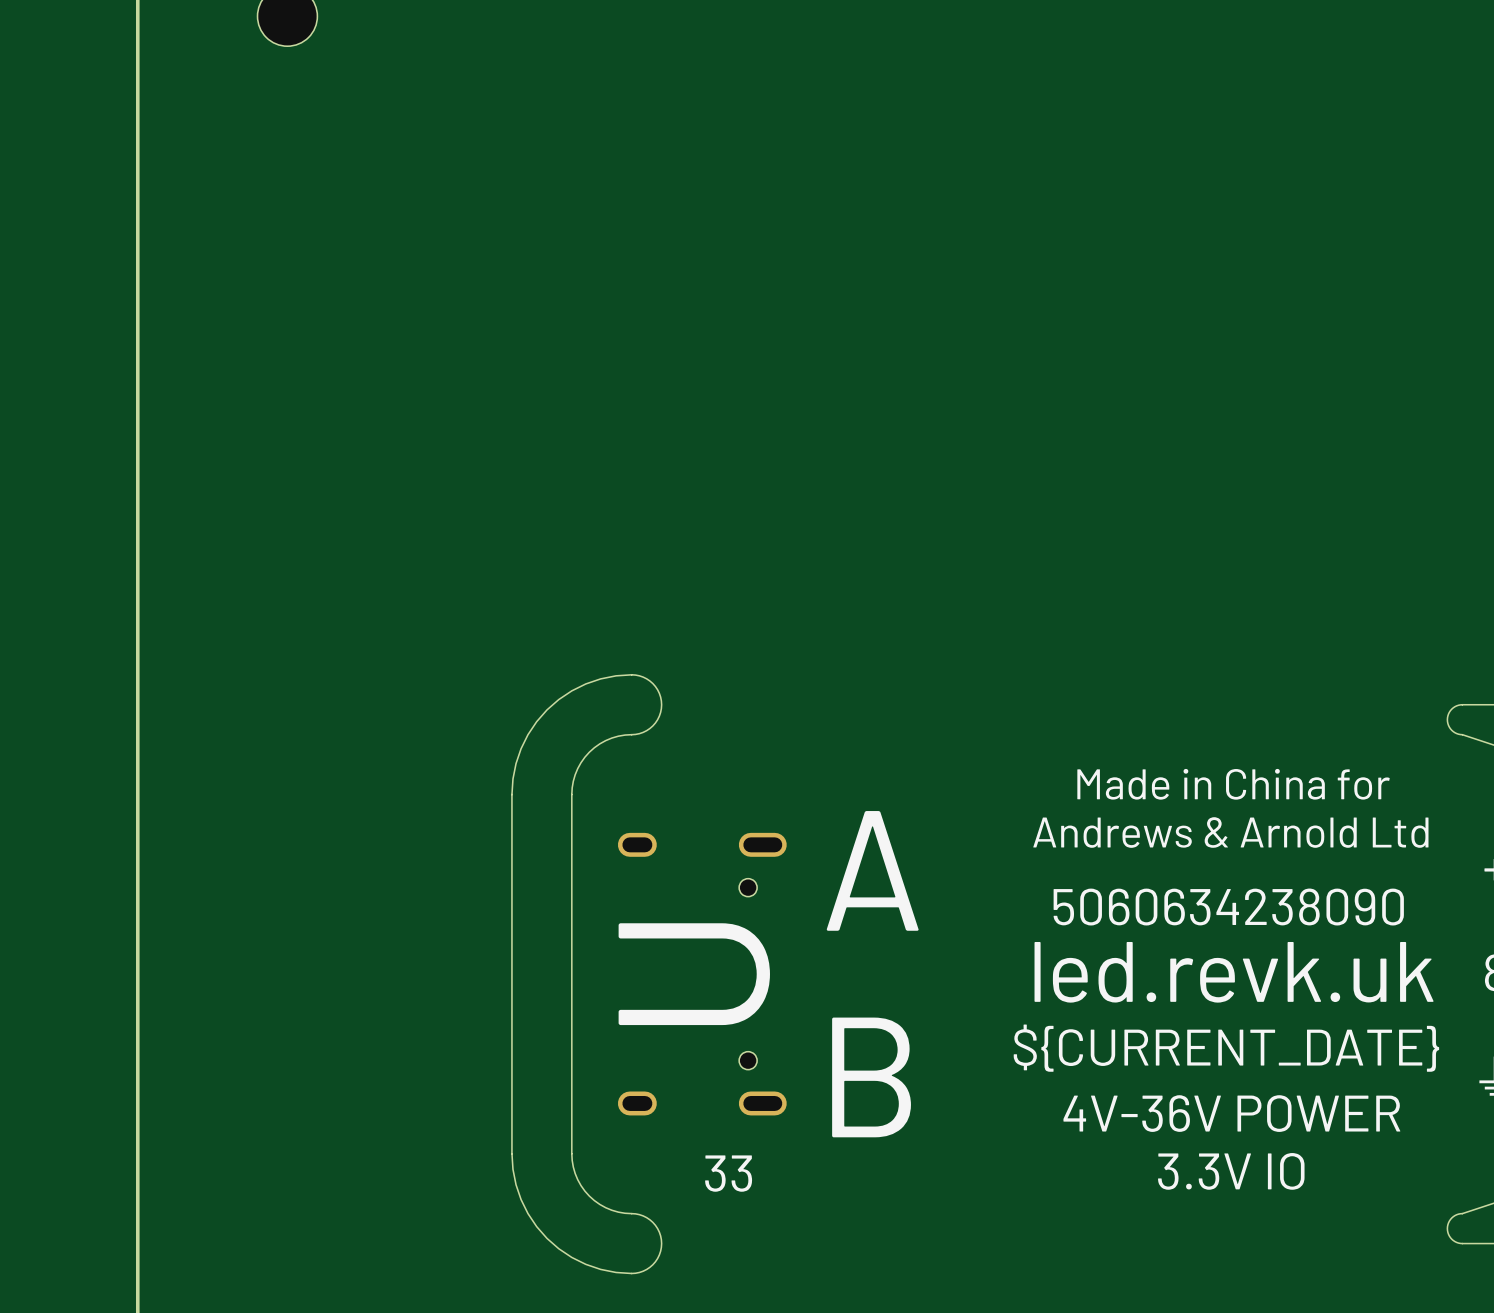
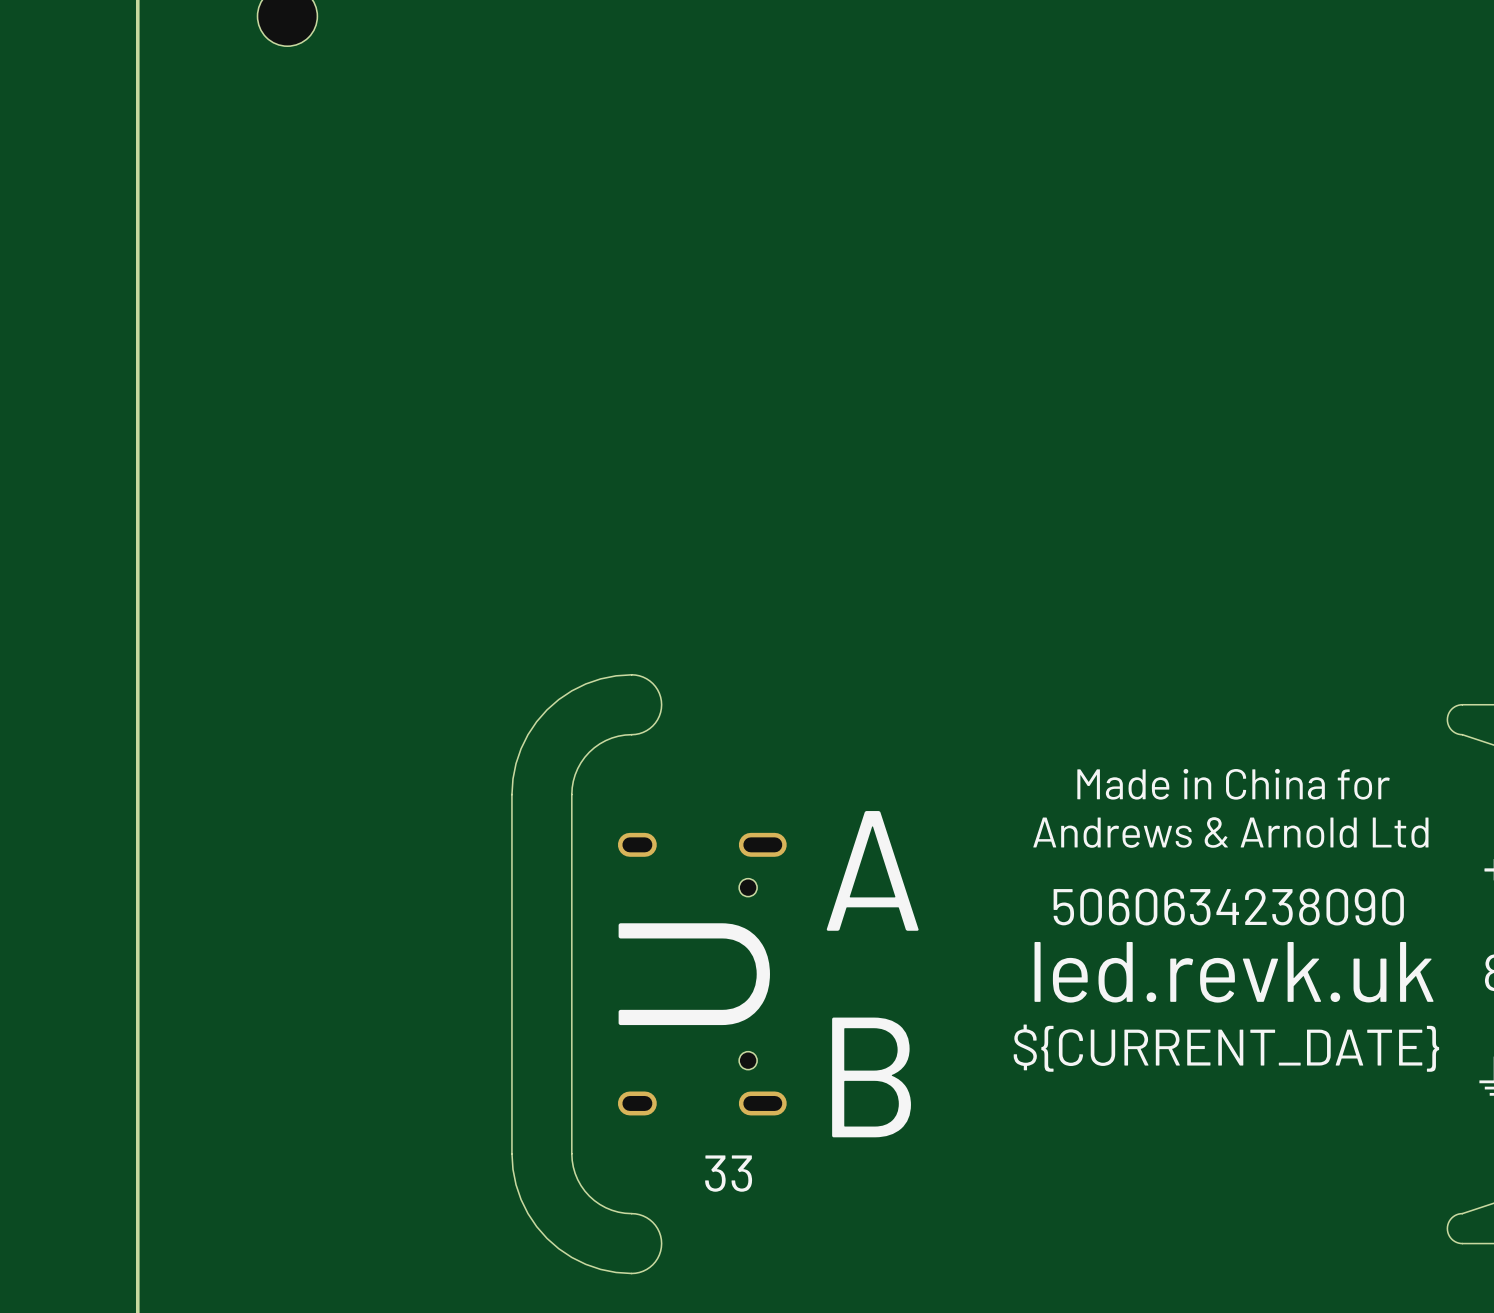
text: 4V-36V POWER (1231, 1113) -> none
text: 3.3V IO (1231, 1171) -> none

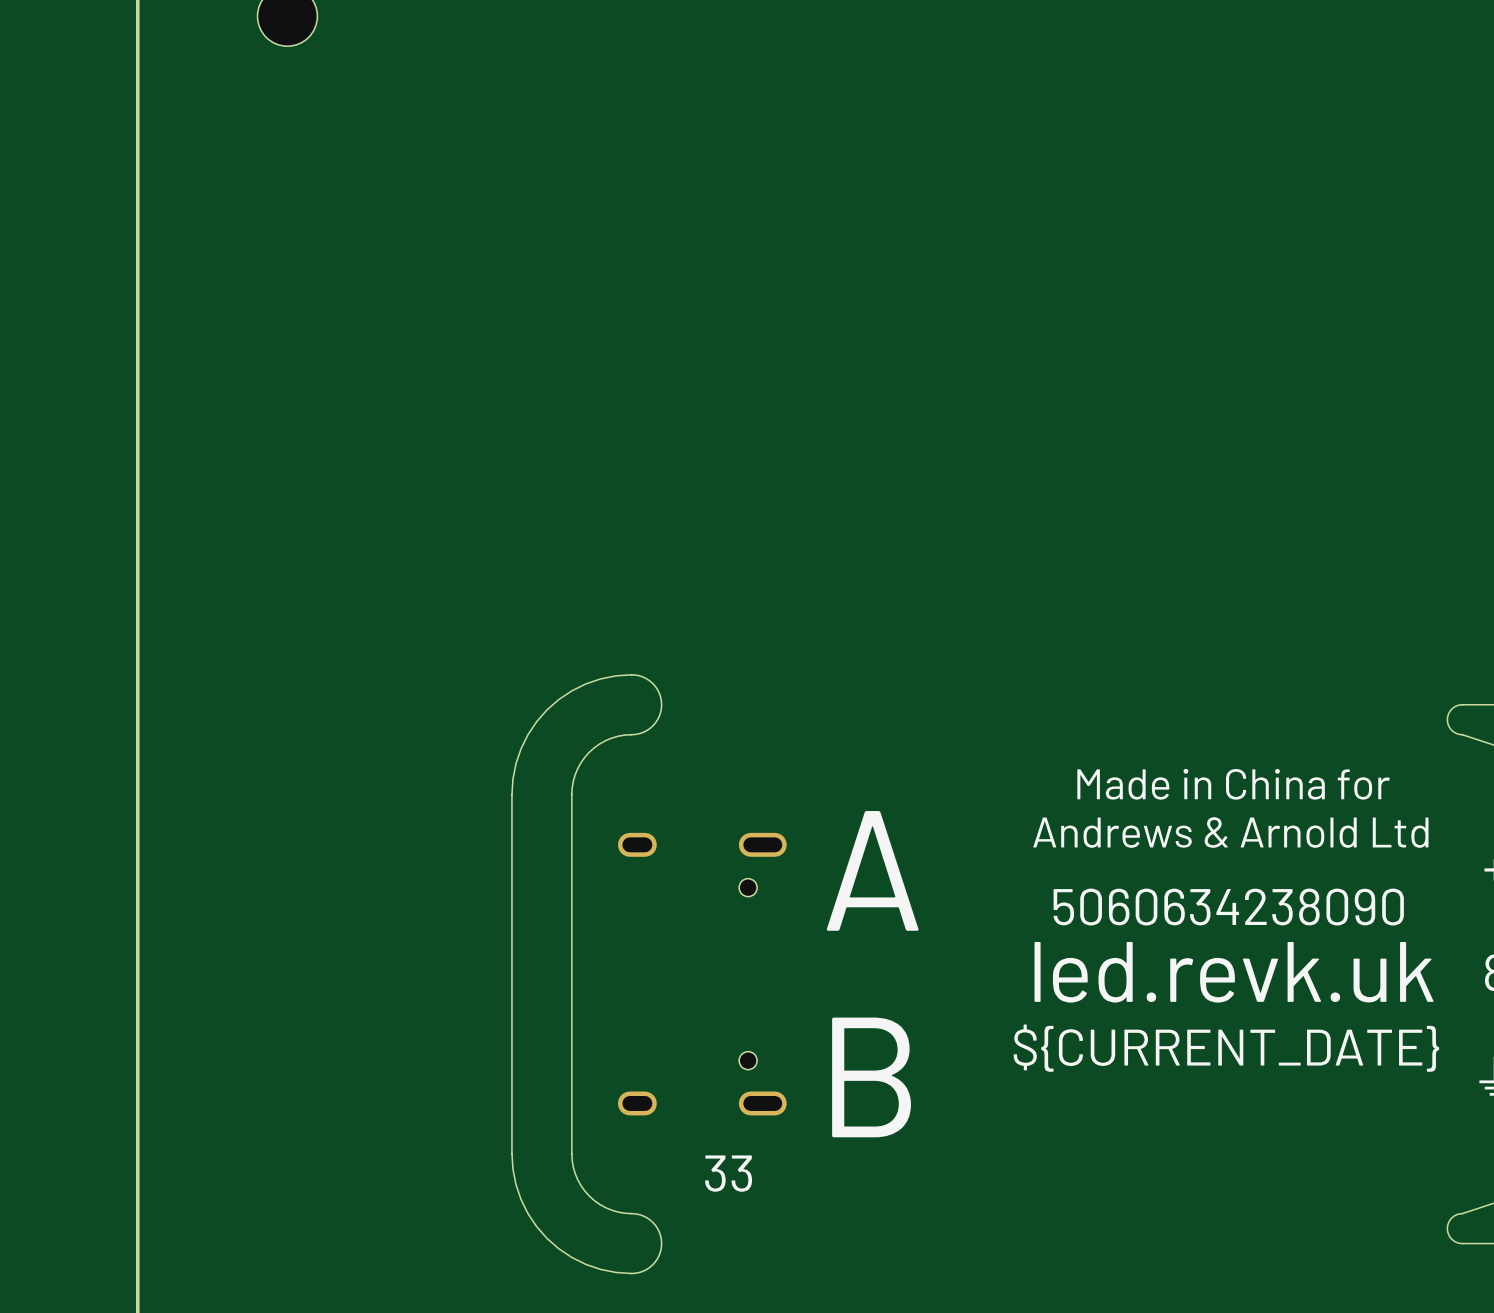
text: U (694, 974) -> none

